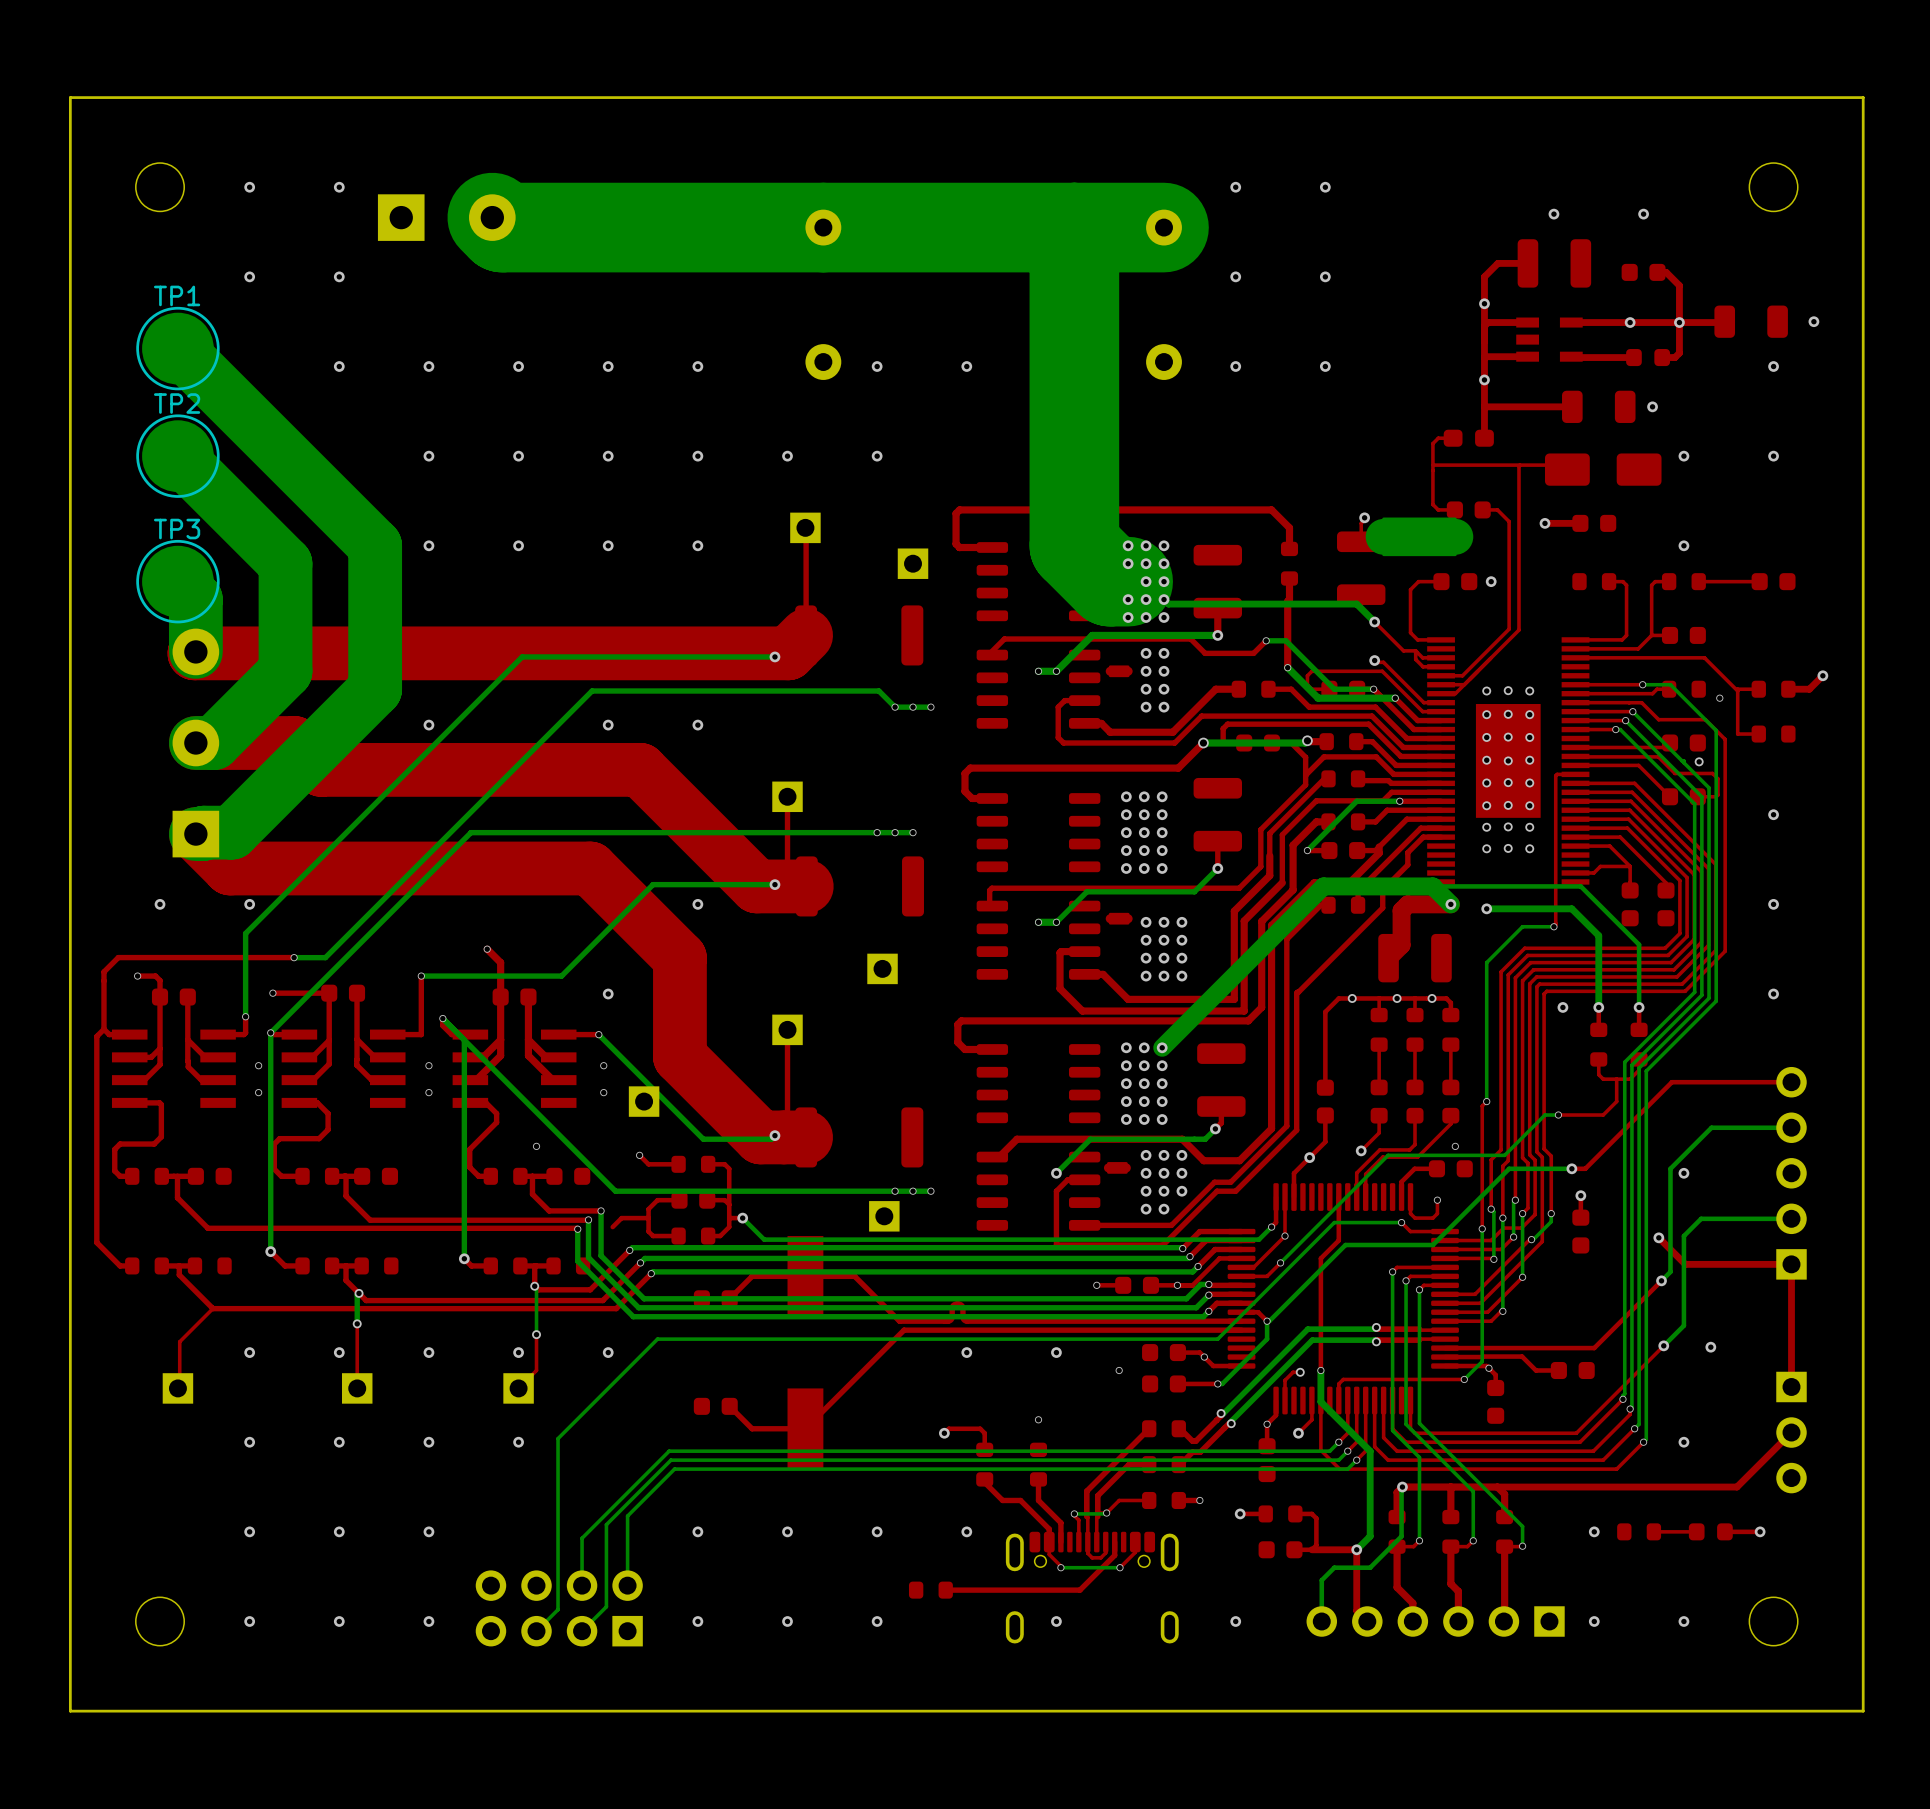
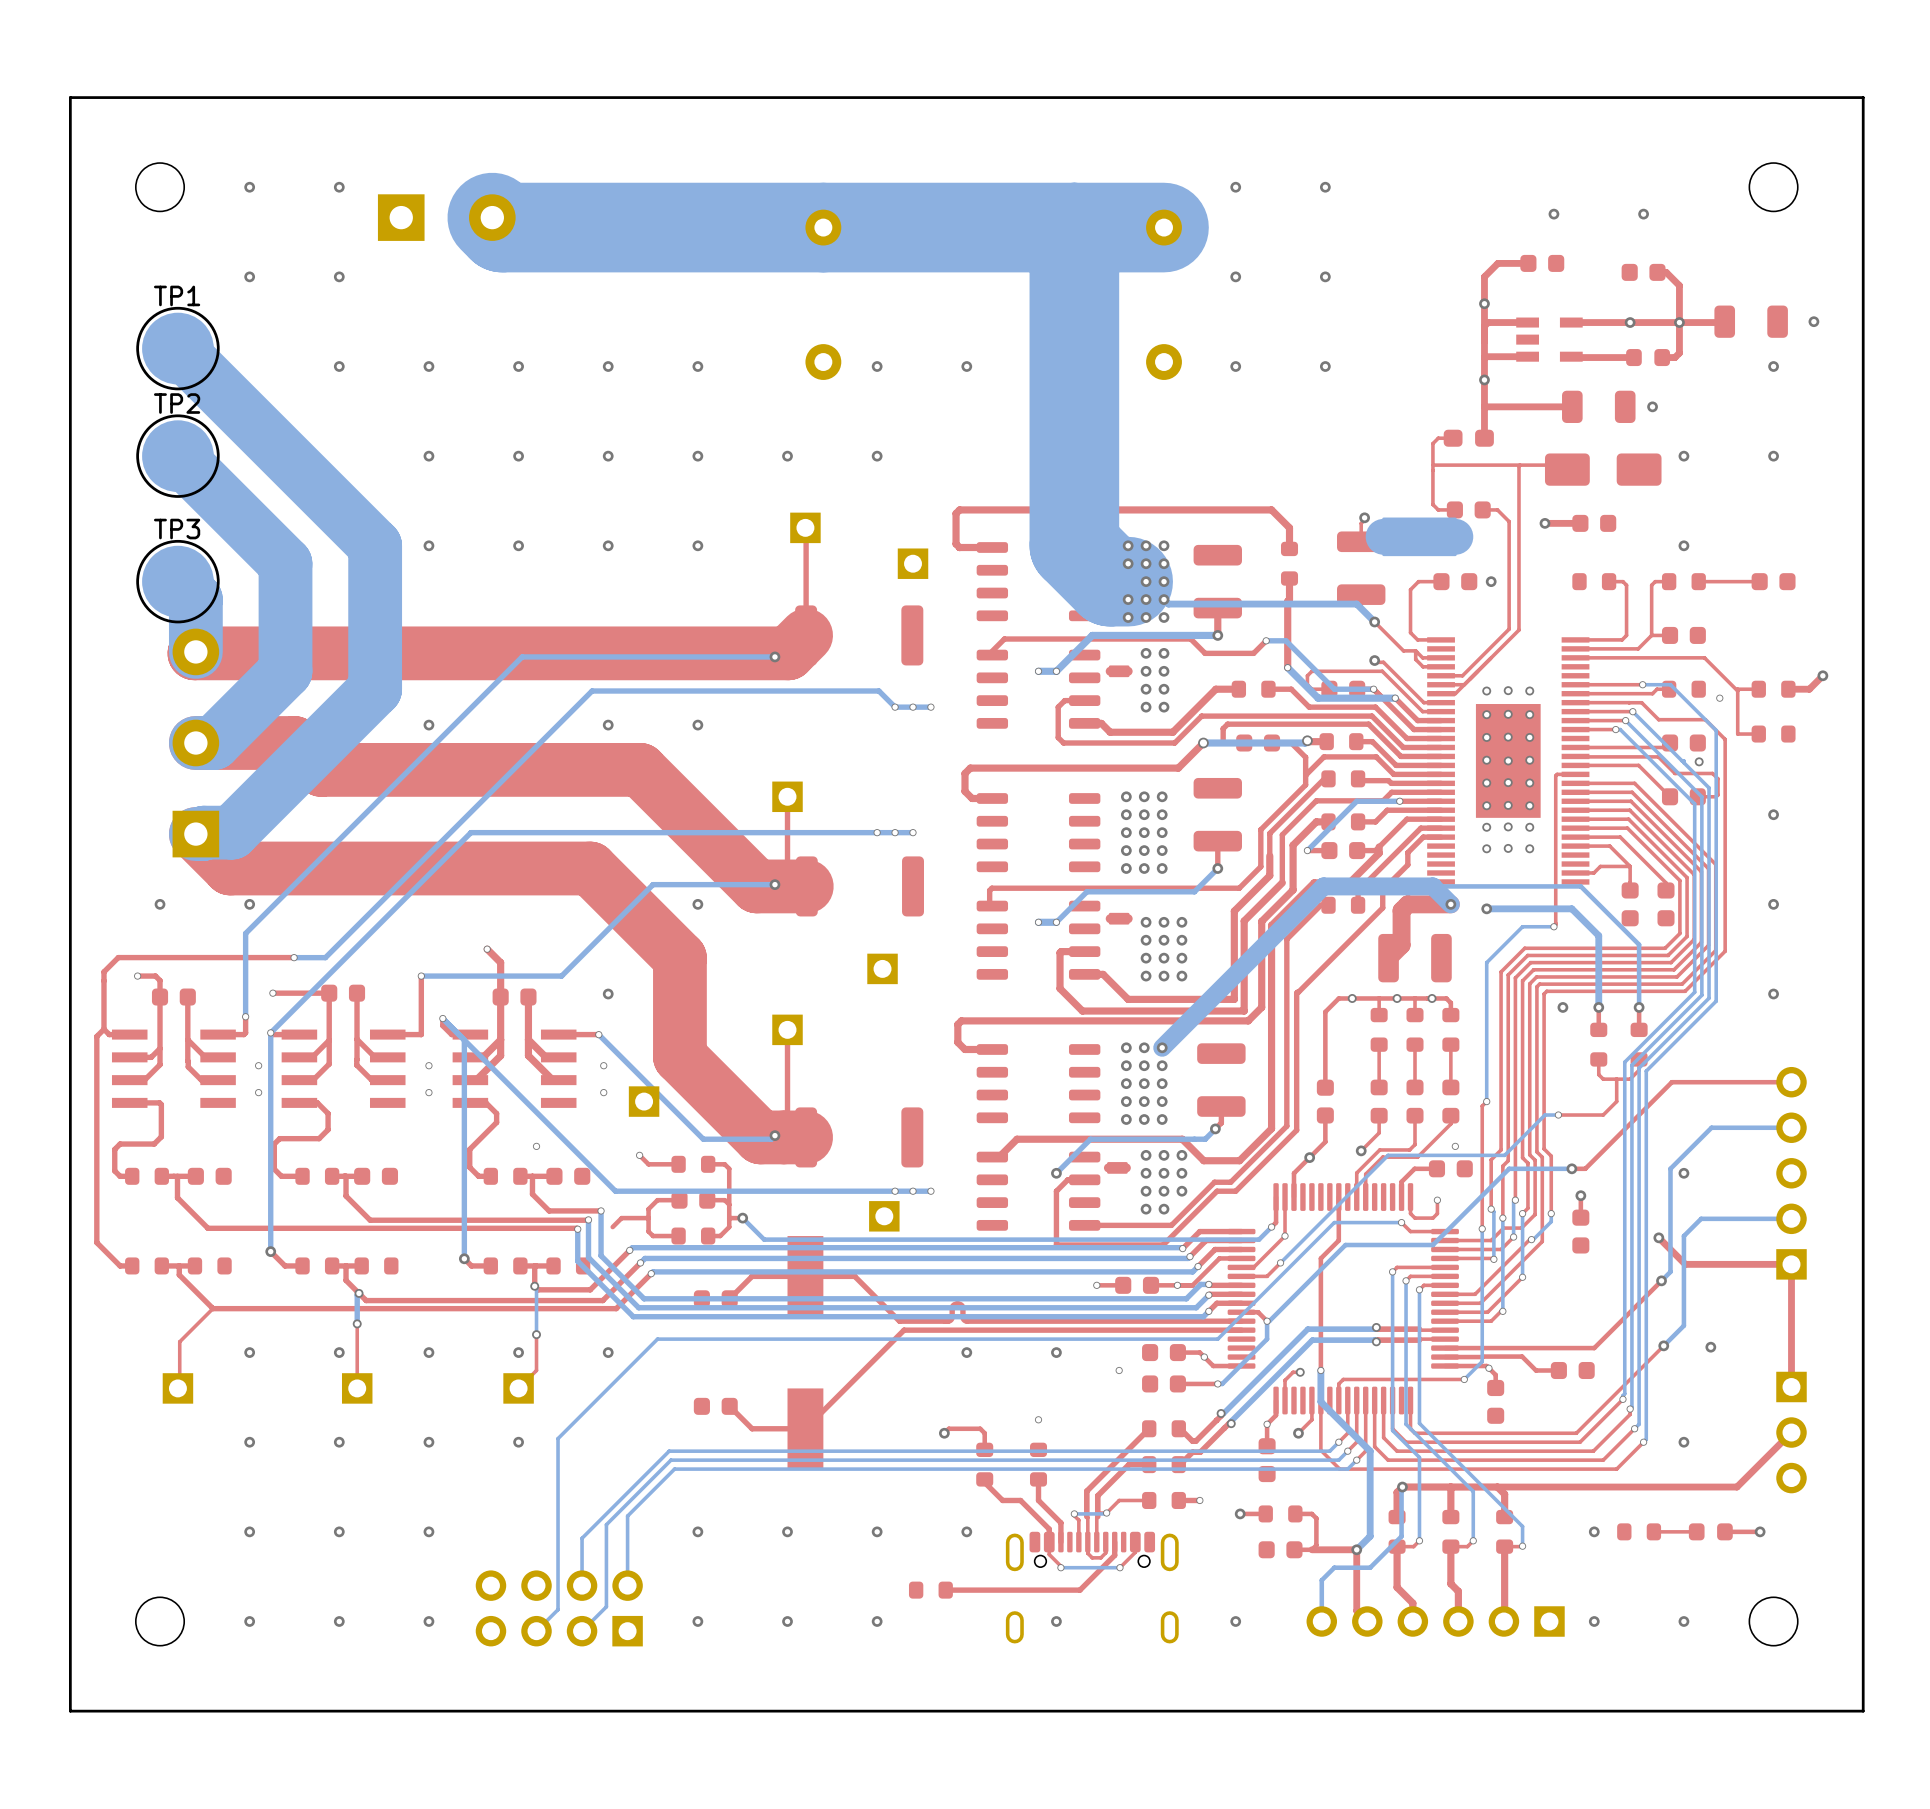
part footprint: [1517, 239, 1592, 288] -> [1520, 254, 1565, 272]

